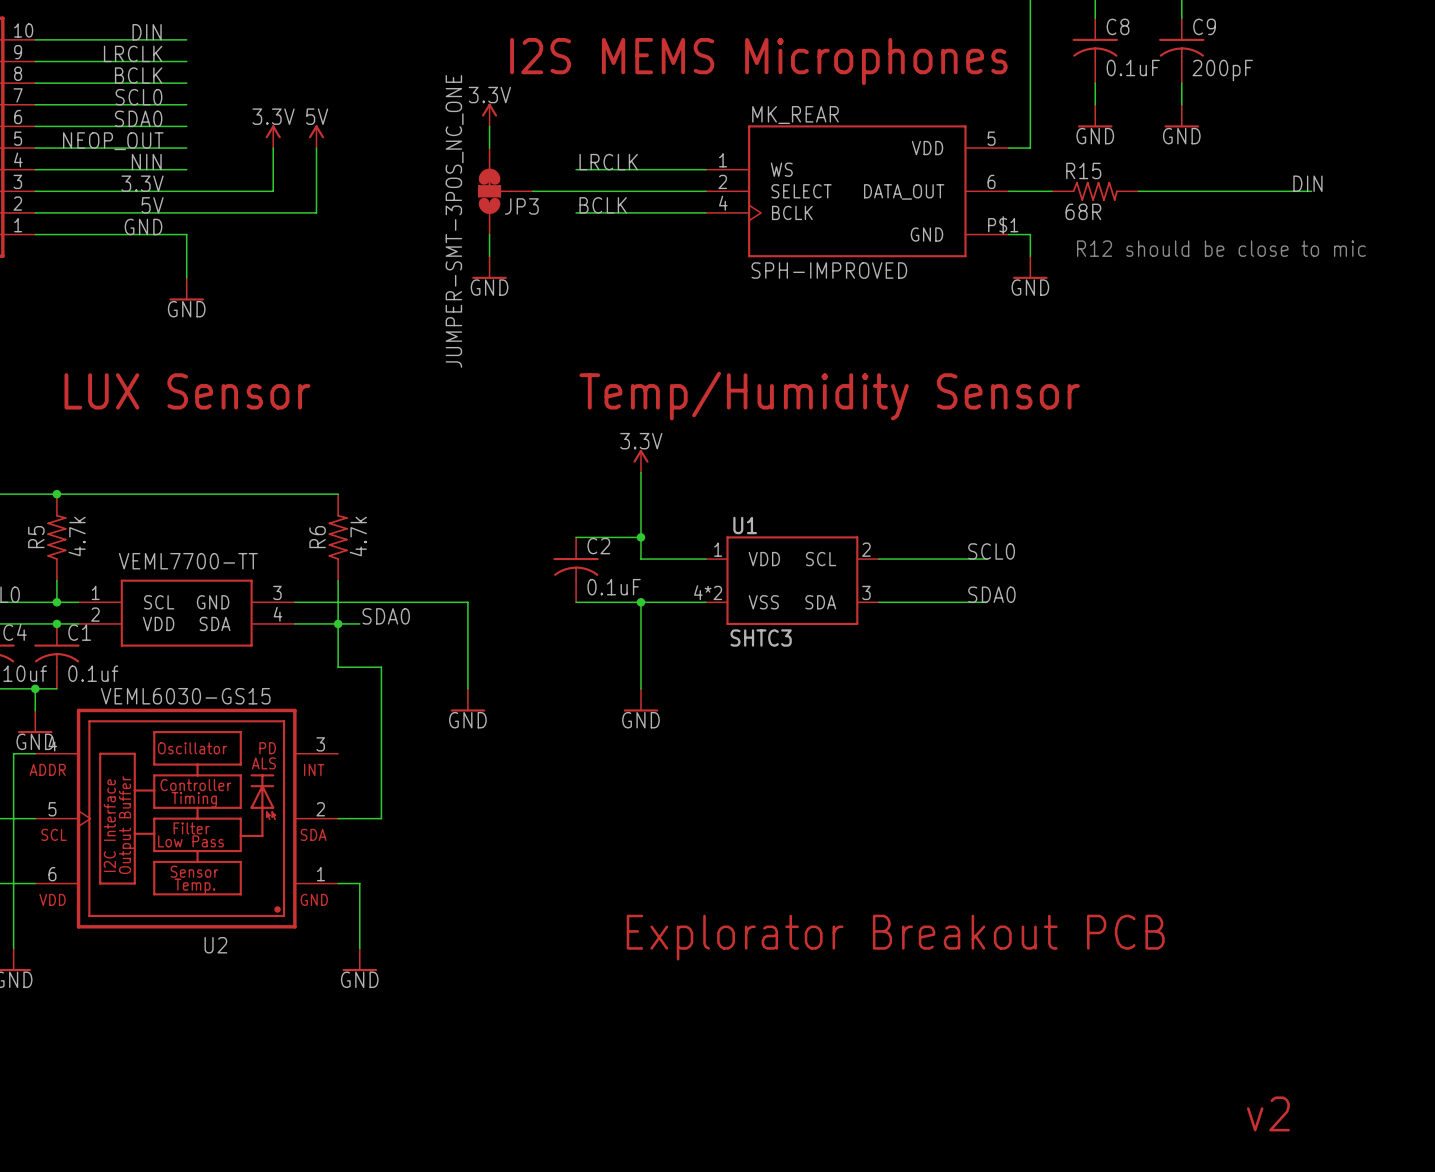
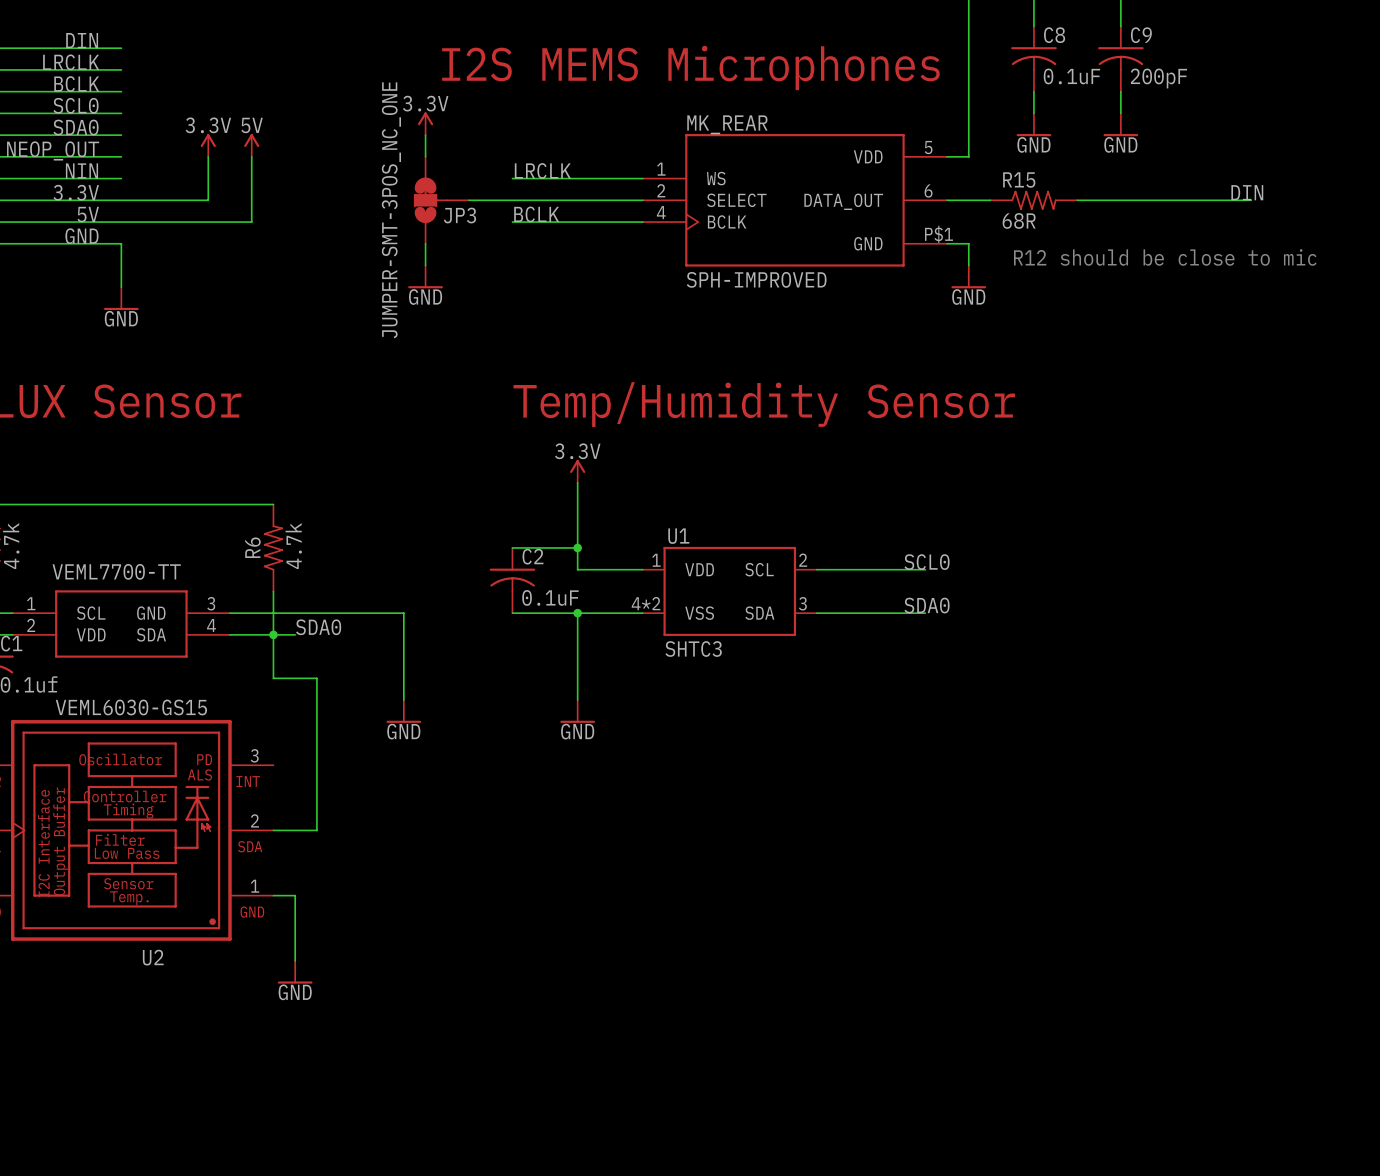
text: Explorator Breakout PCB (895, 937) -> none
text: v2 (1268, 1113) -> none

